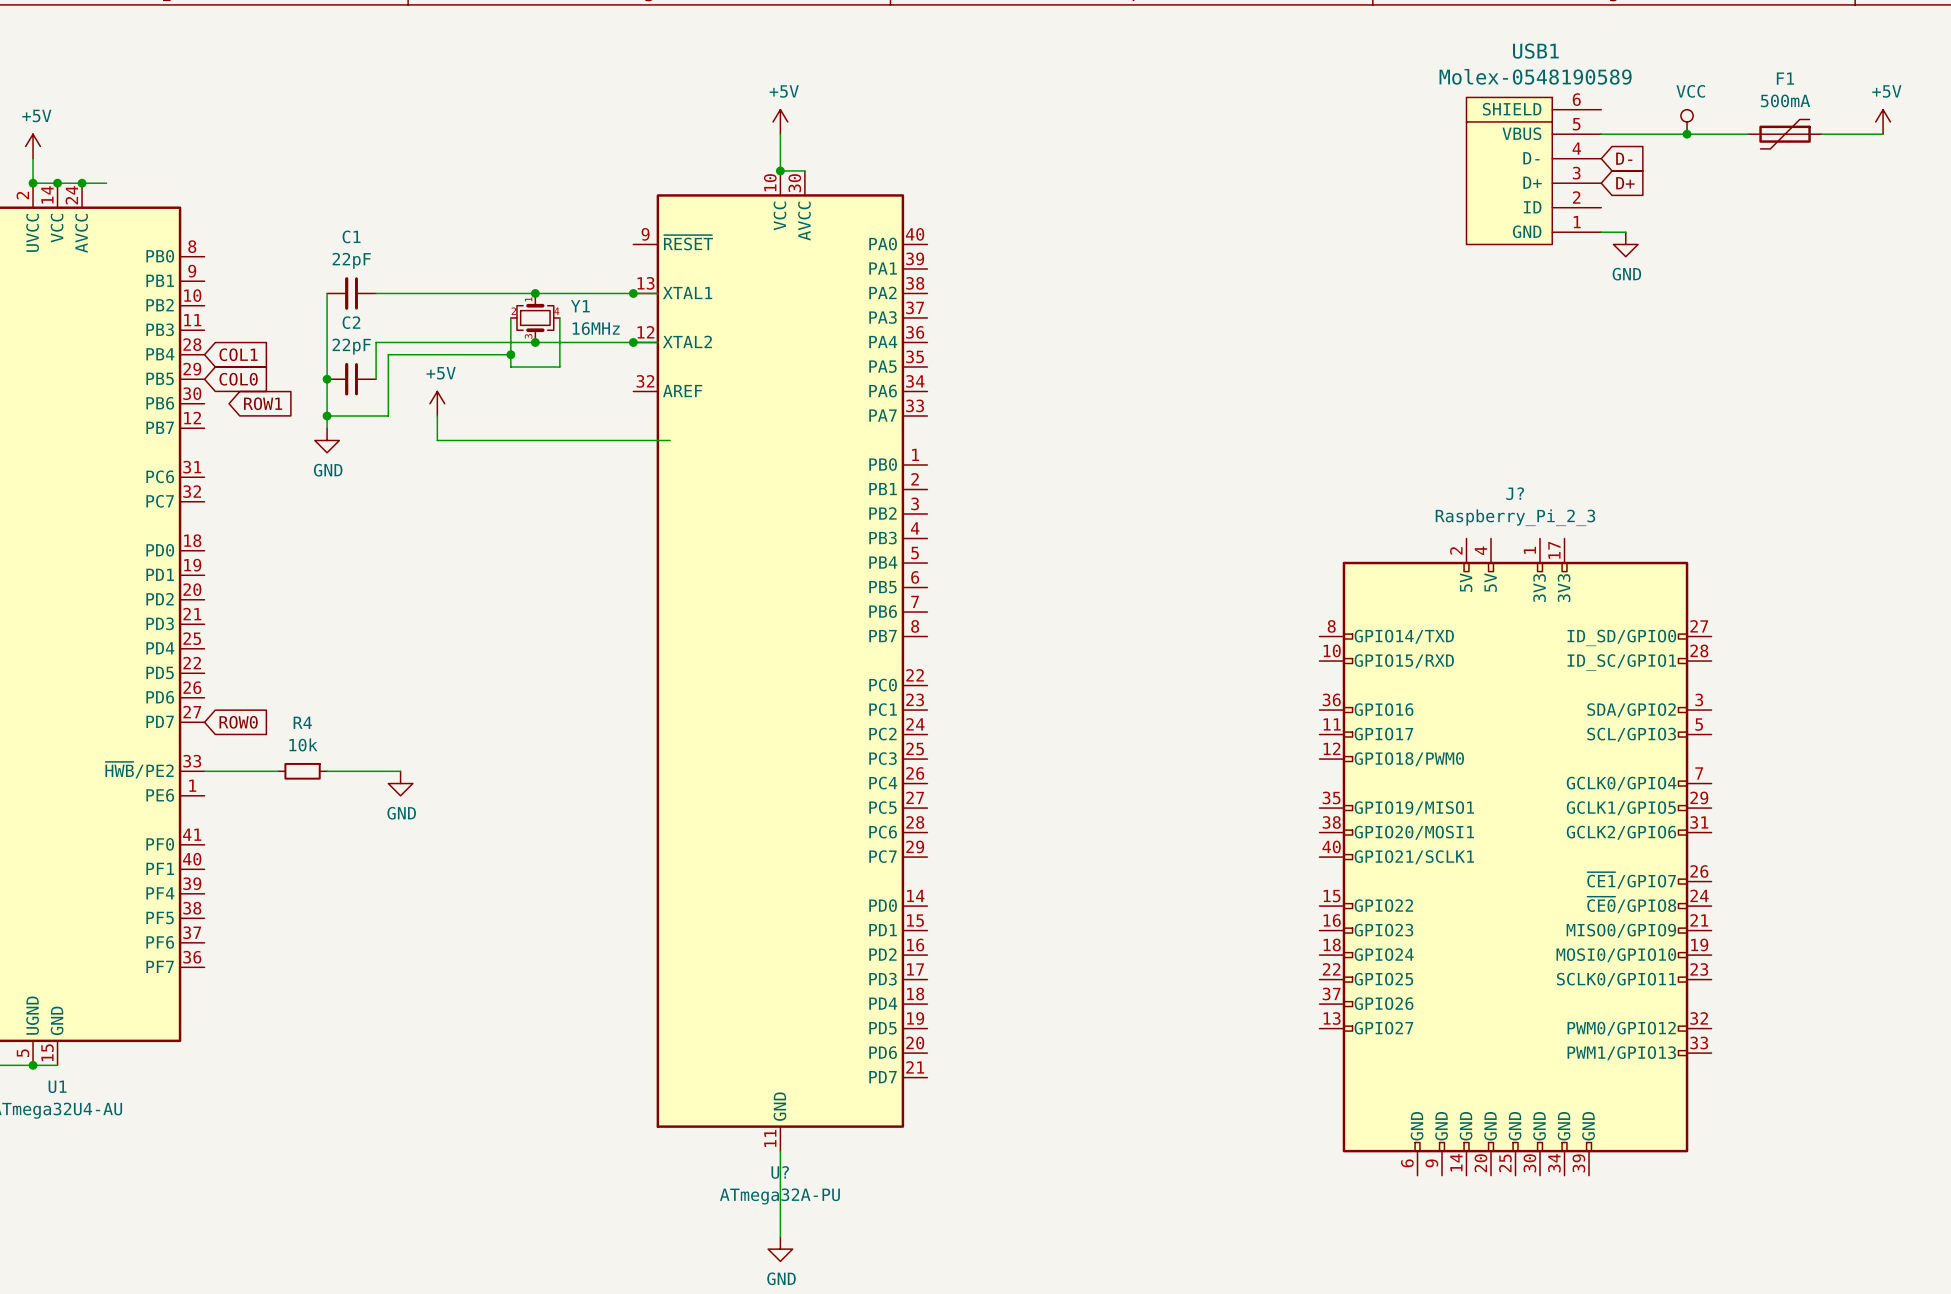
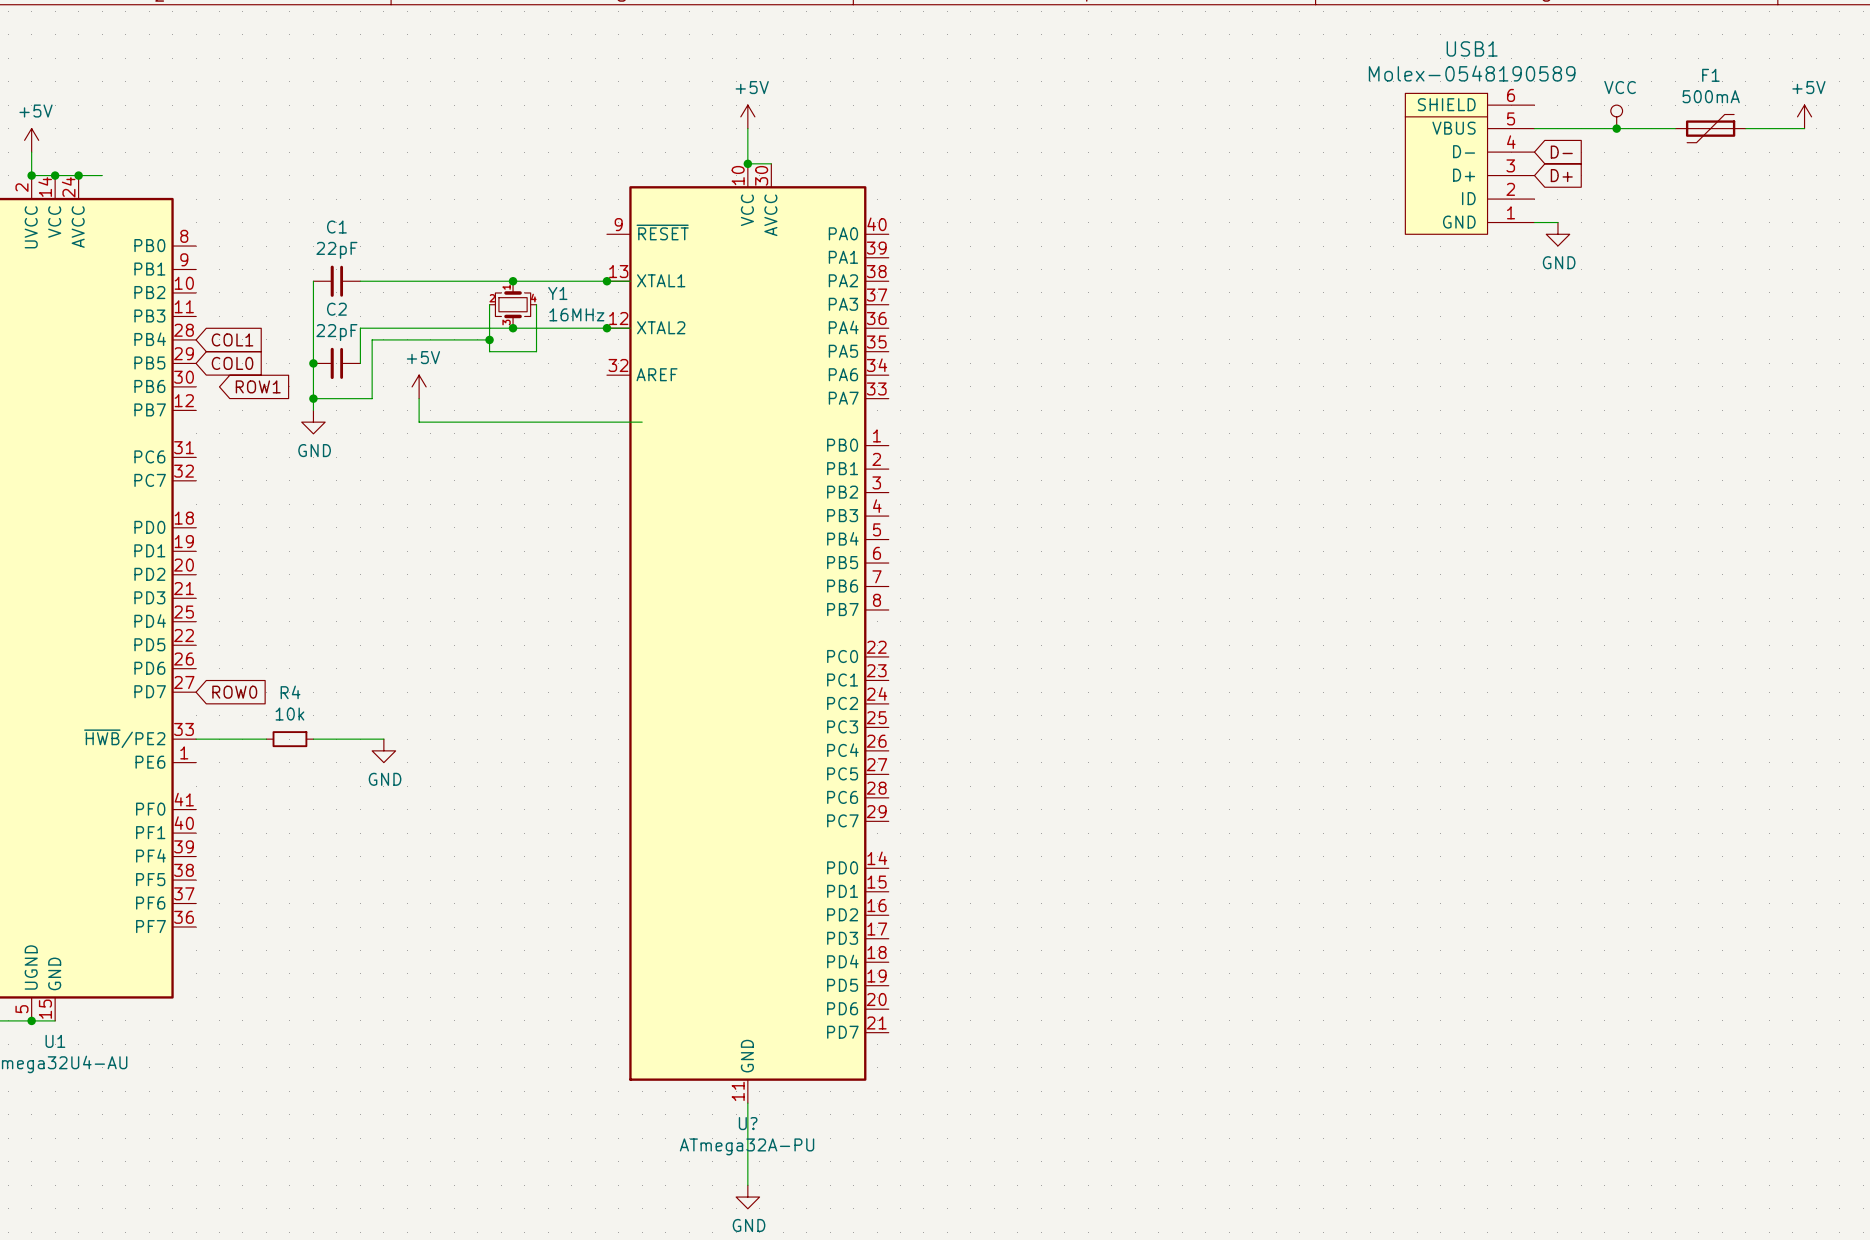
J?: Raspberry_Pi_2_3 (1515, 857) -> none

